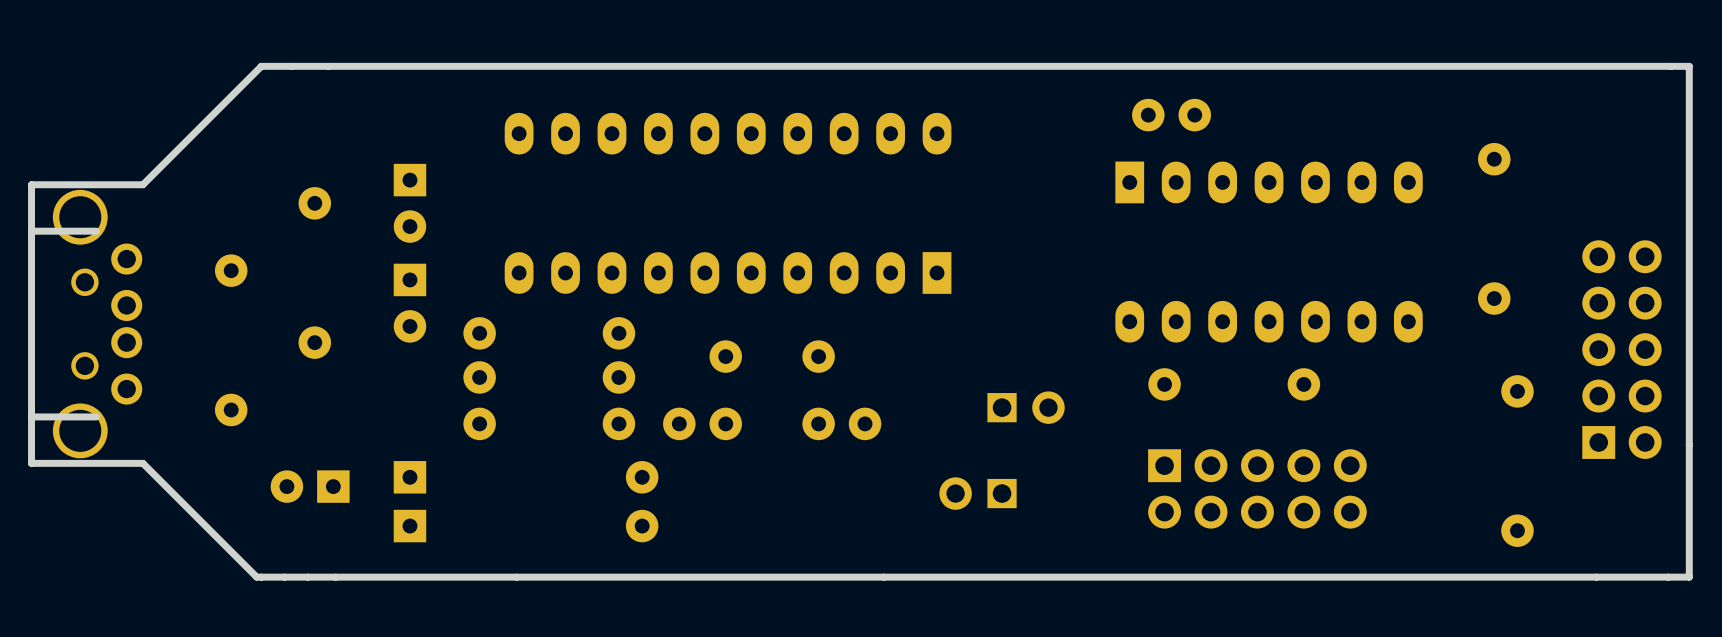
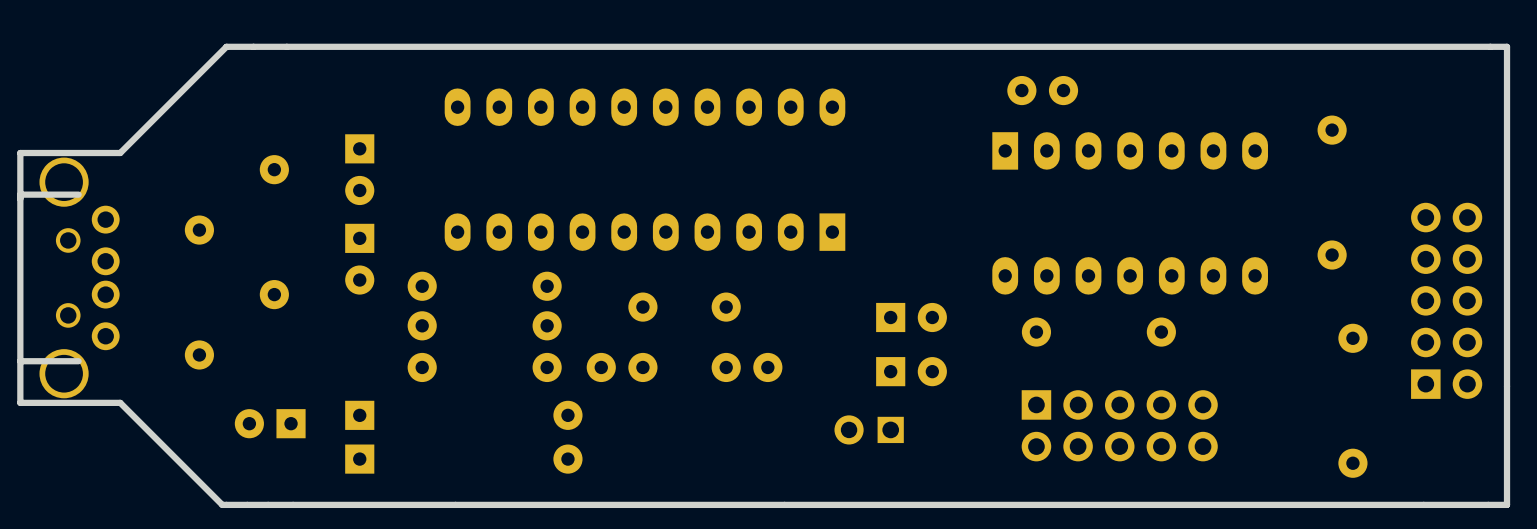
part: none -> (911, 317)
part: (1026, 407) -> none
part: none -> (911, 371)

